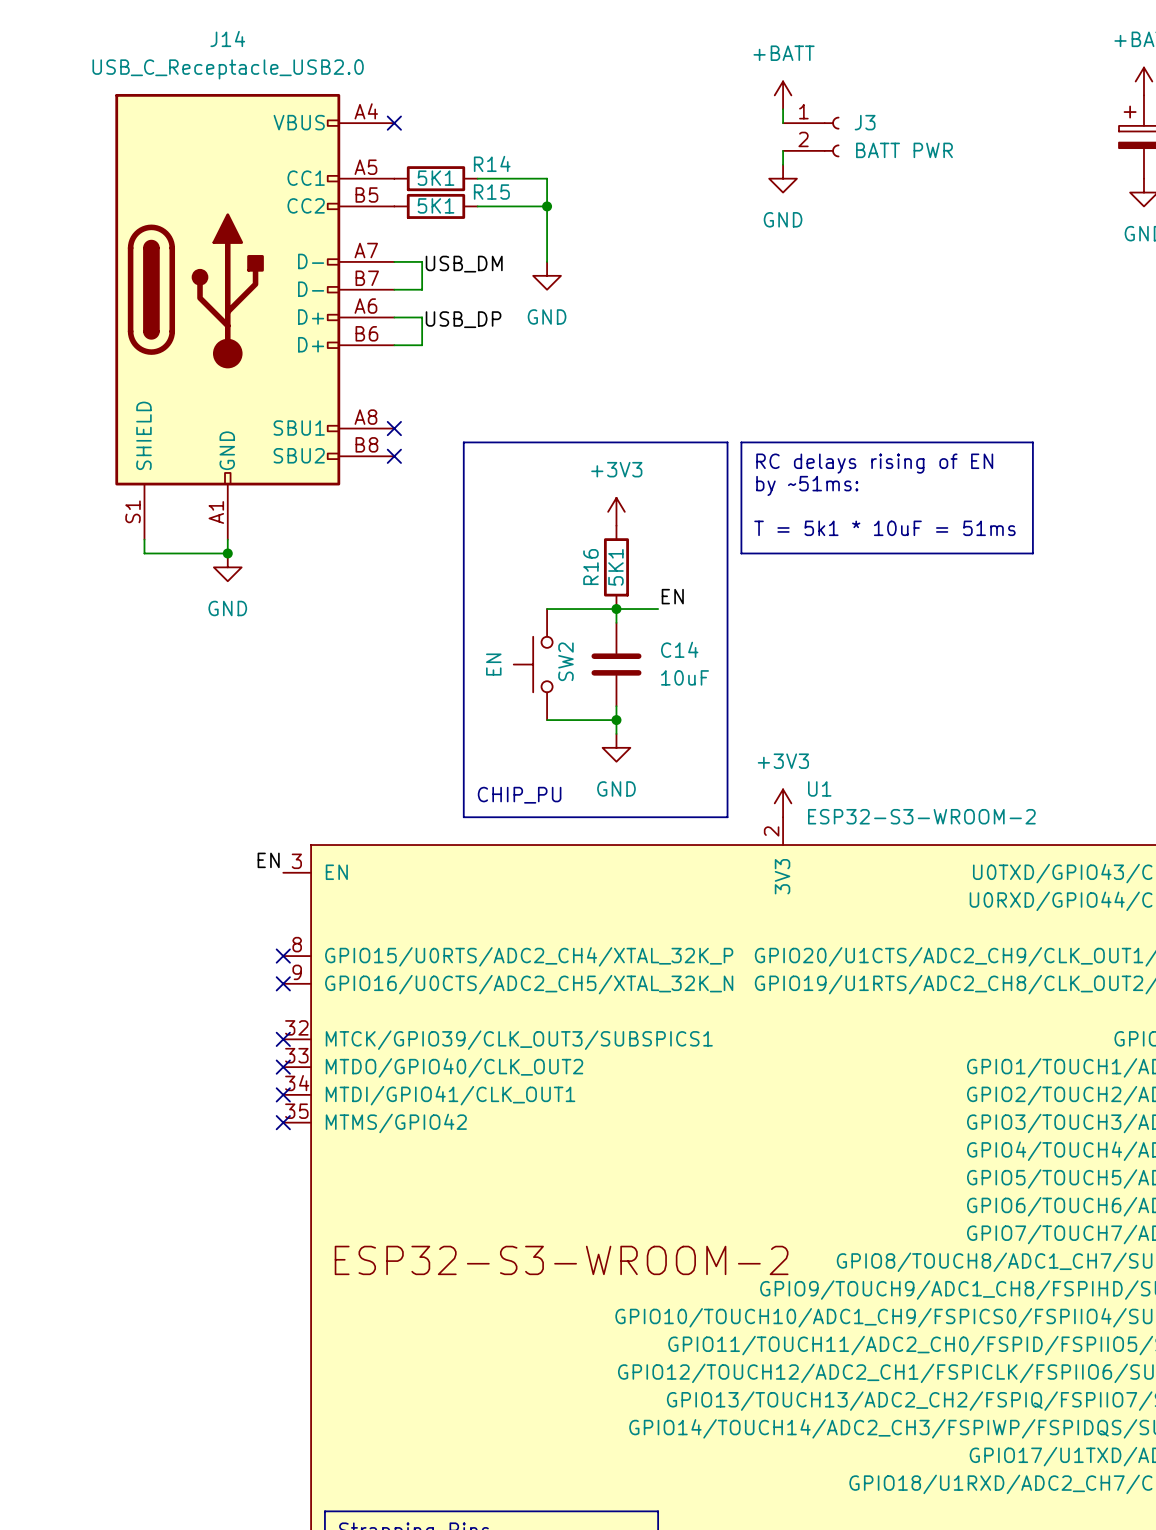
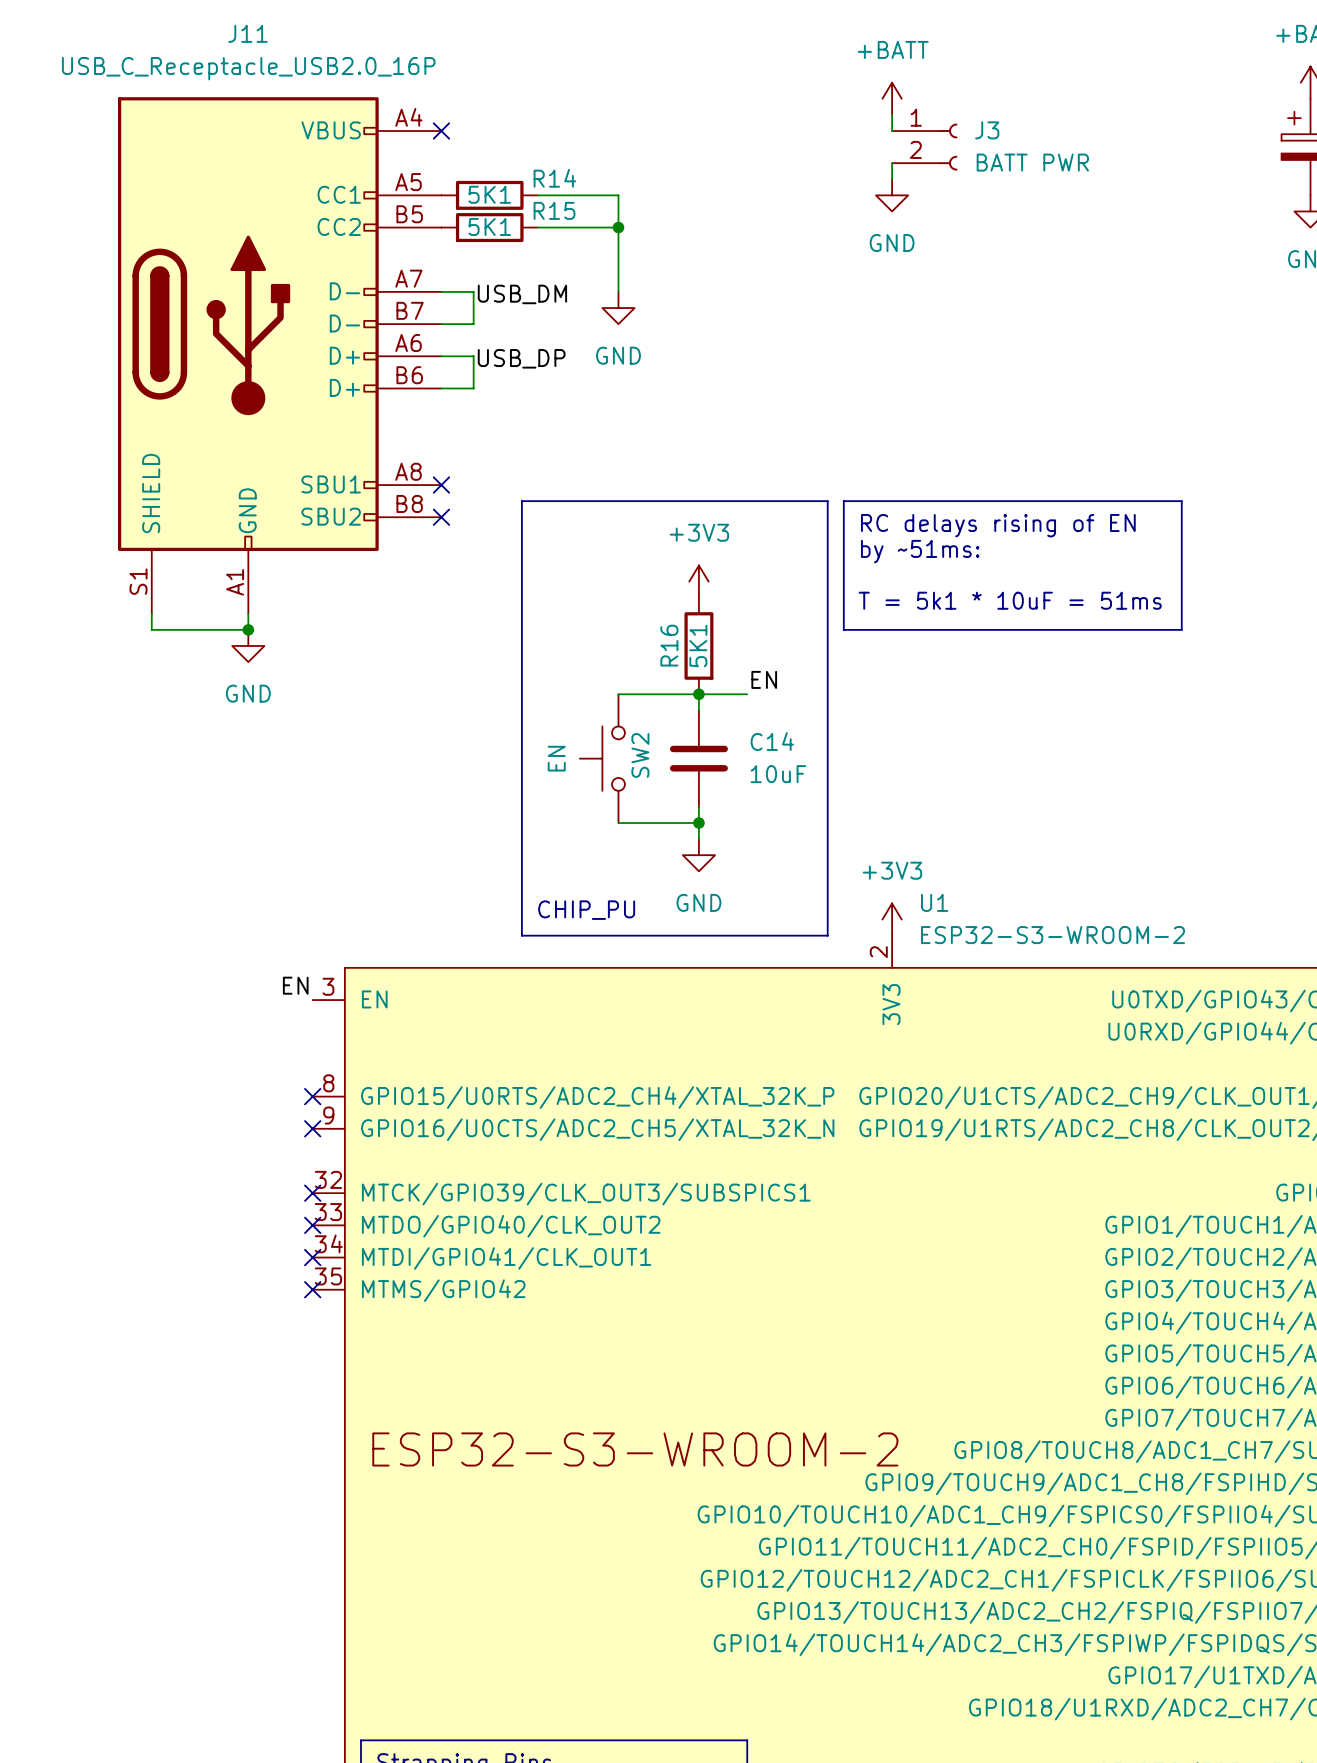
J14 name: J14 (227, 39) -> J11 (247, 33)
J14 value: USB_C_Receptacle_USB2.0 (228, 69) -> USB_C_Receptacle_USB2.0_16P (248, 68)

